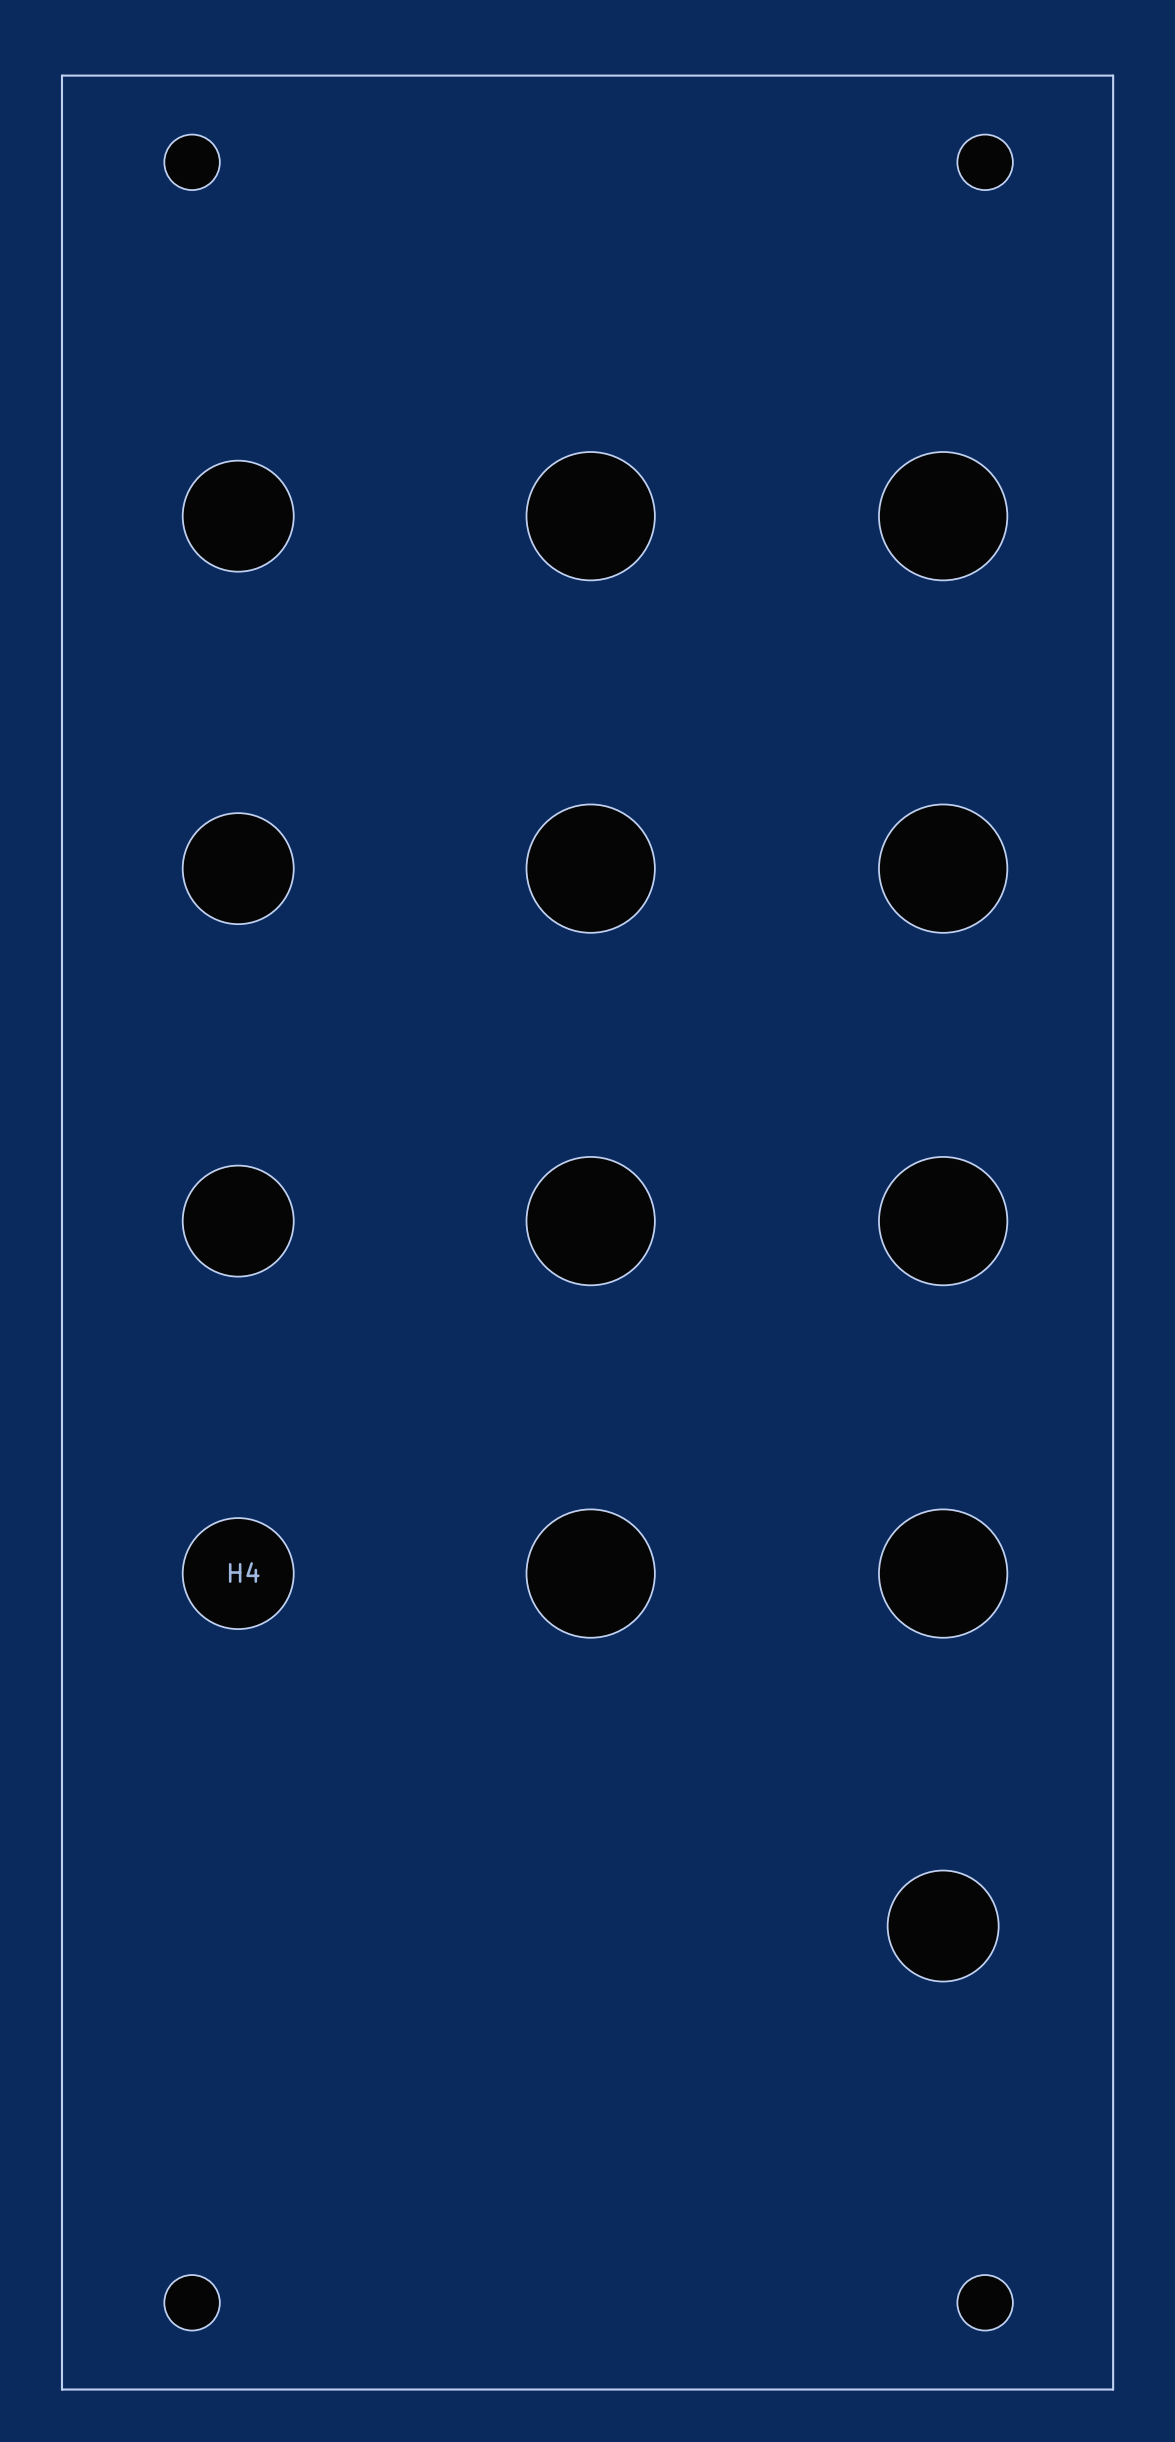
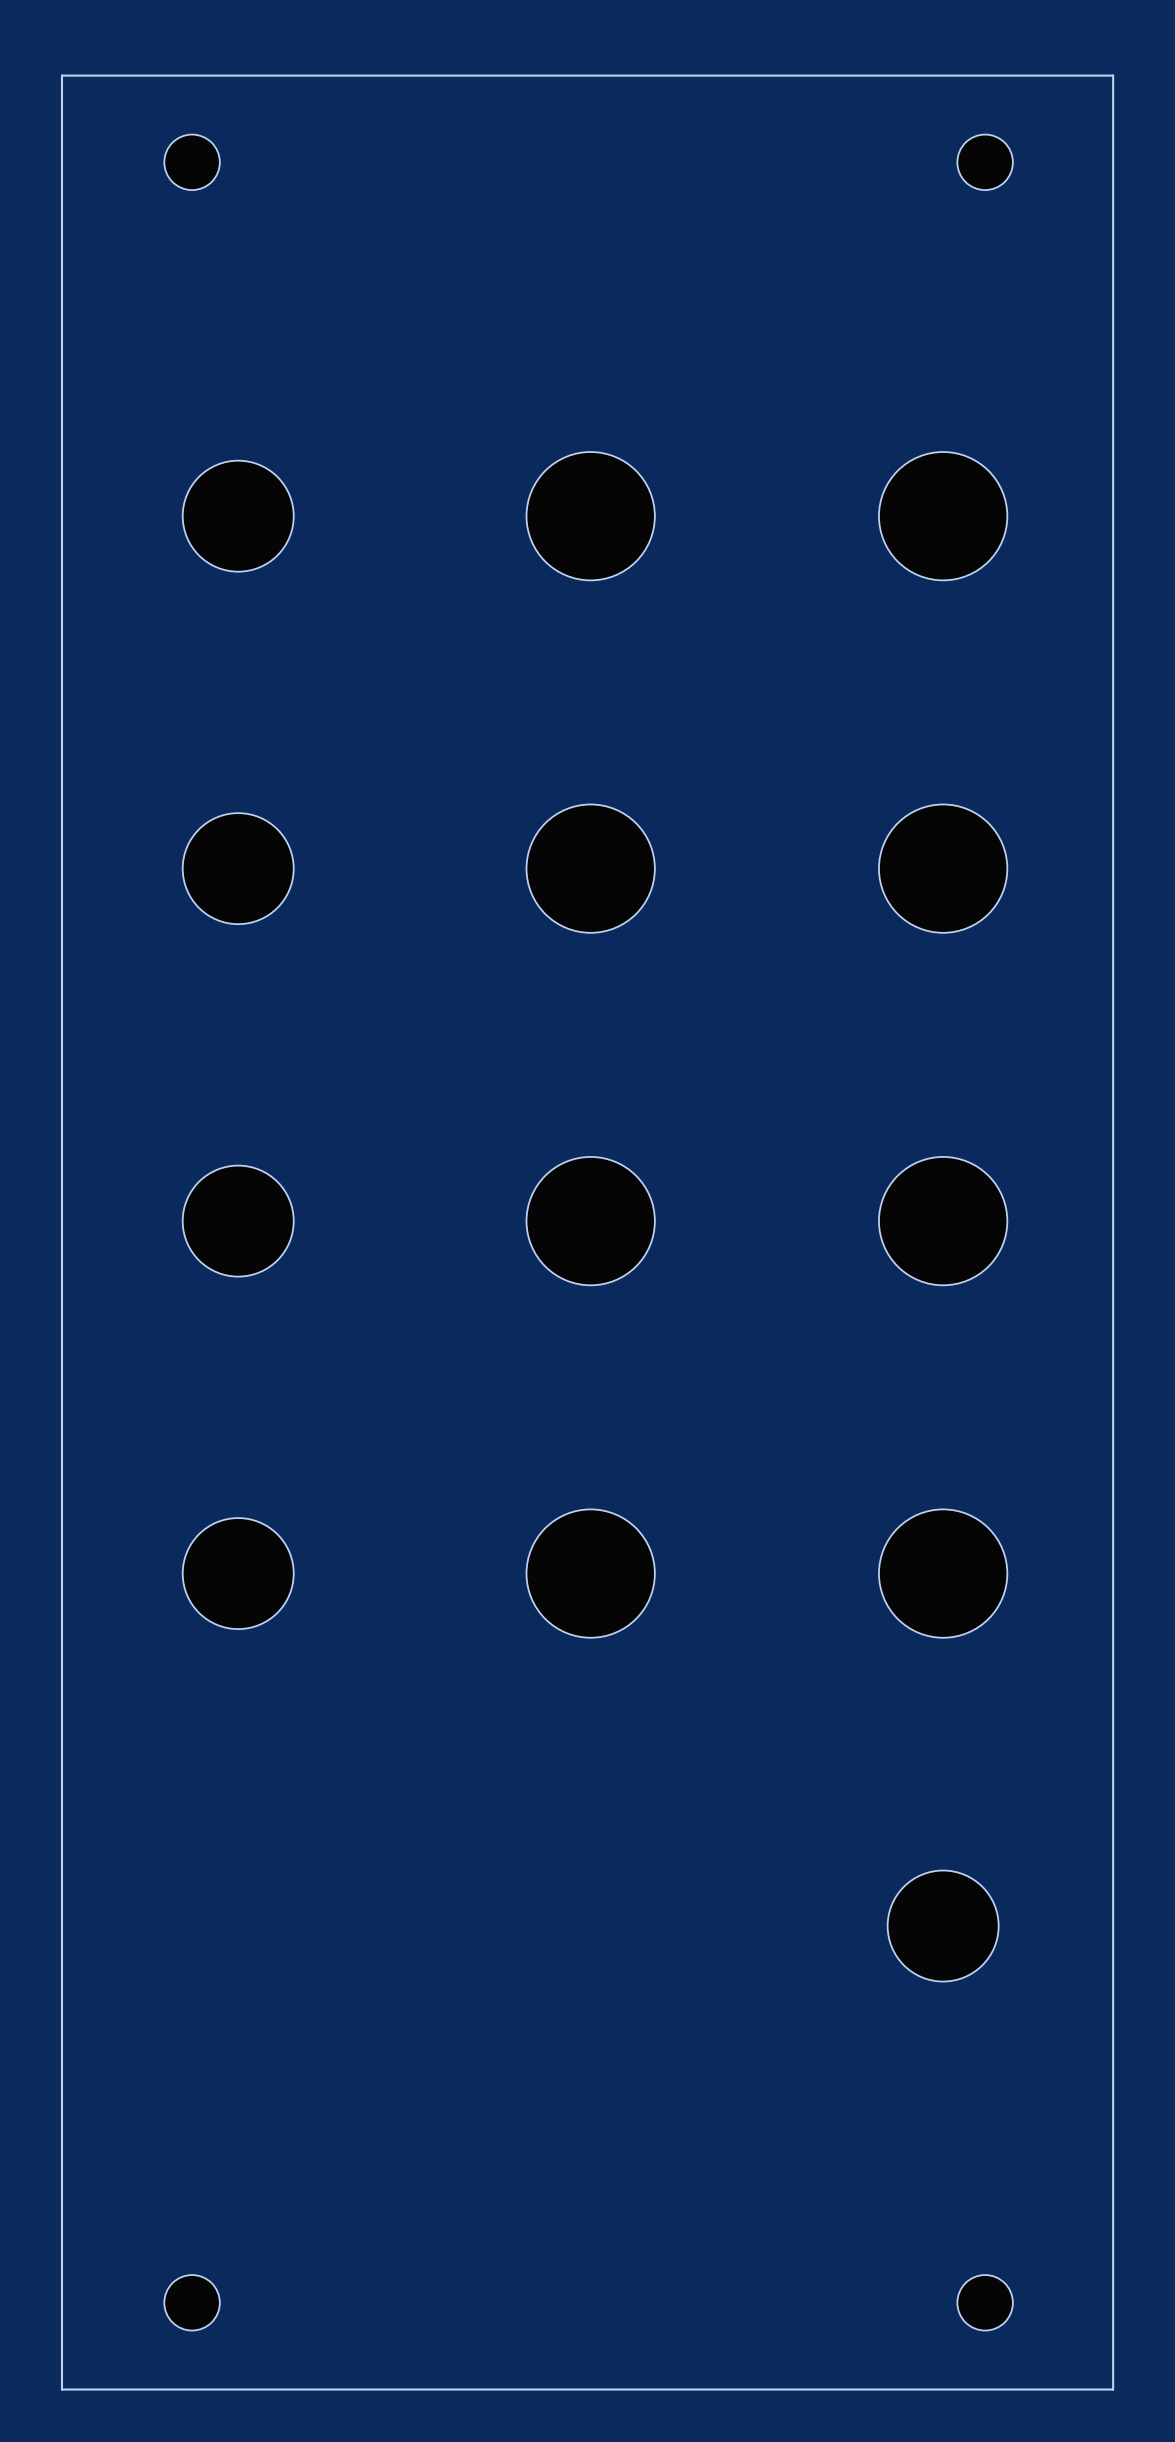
H4 name: H4 (244, 1572) -> none

